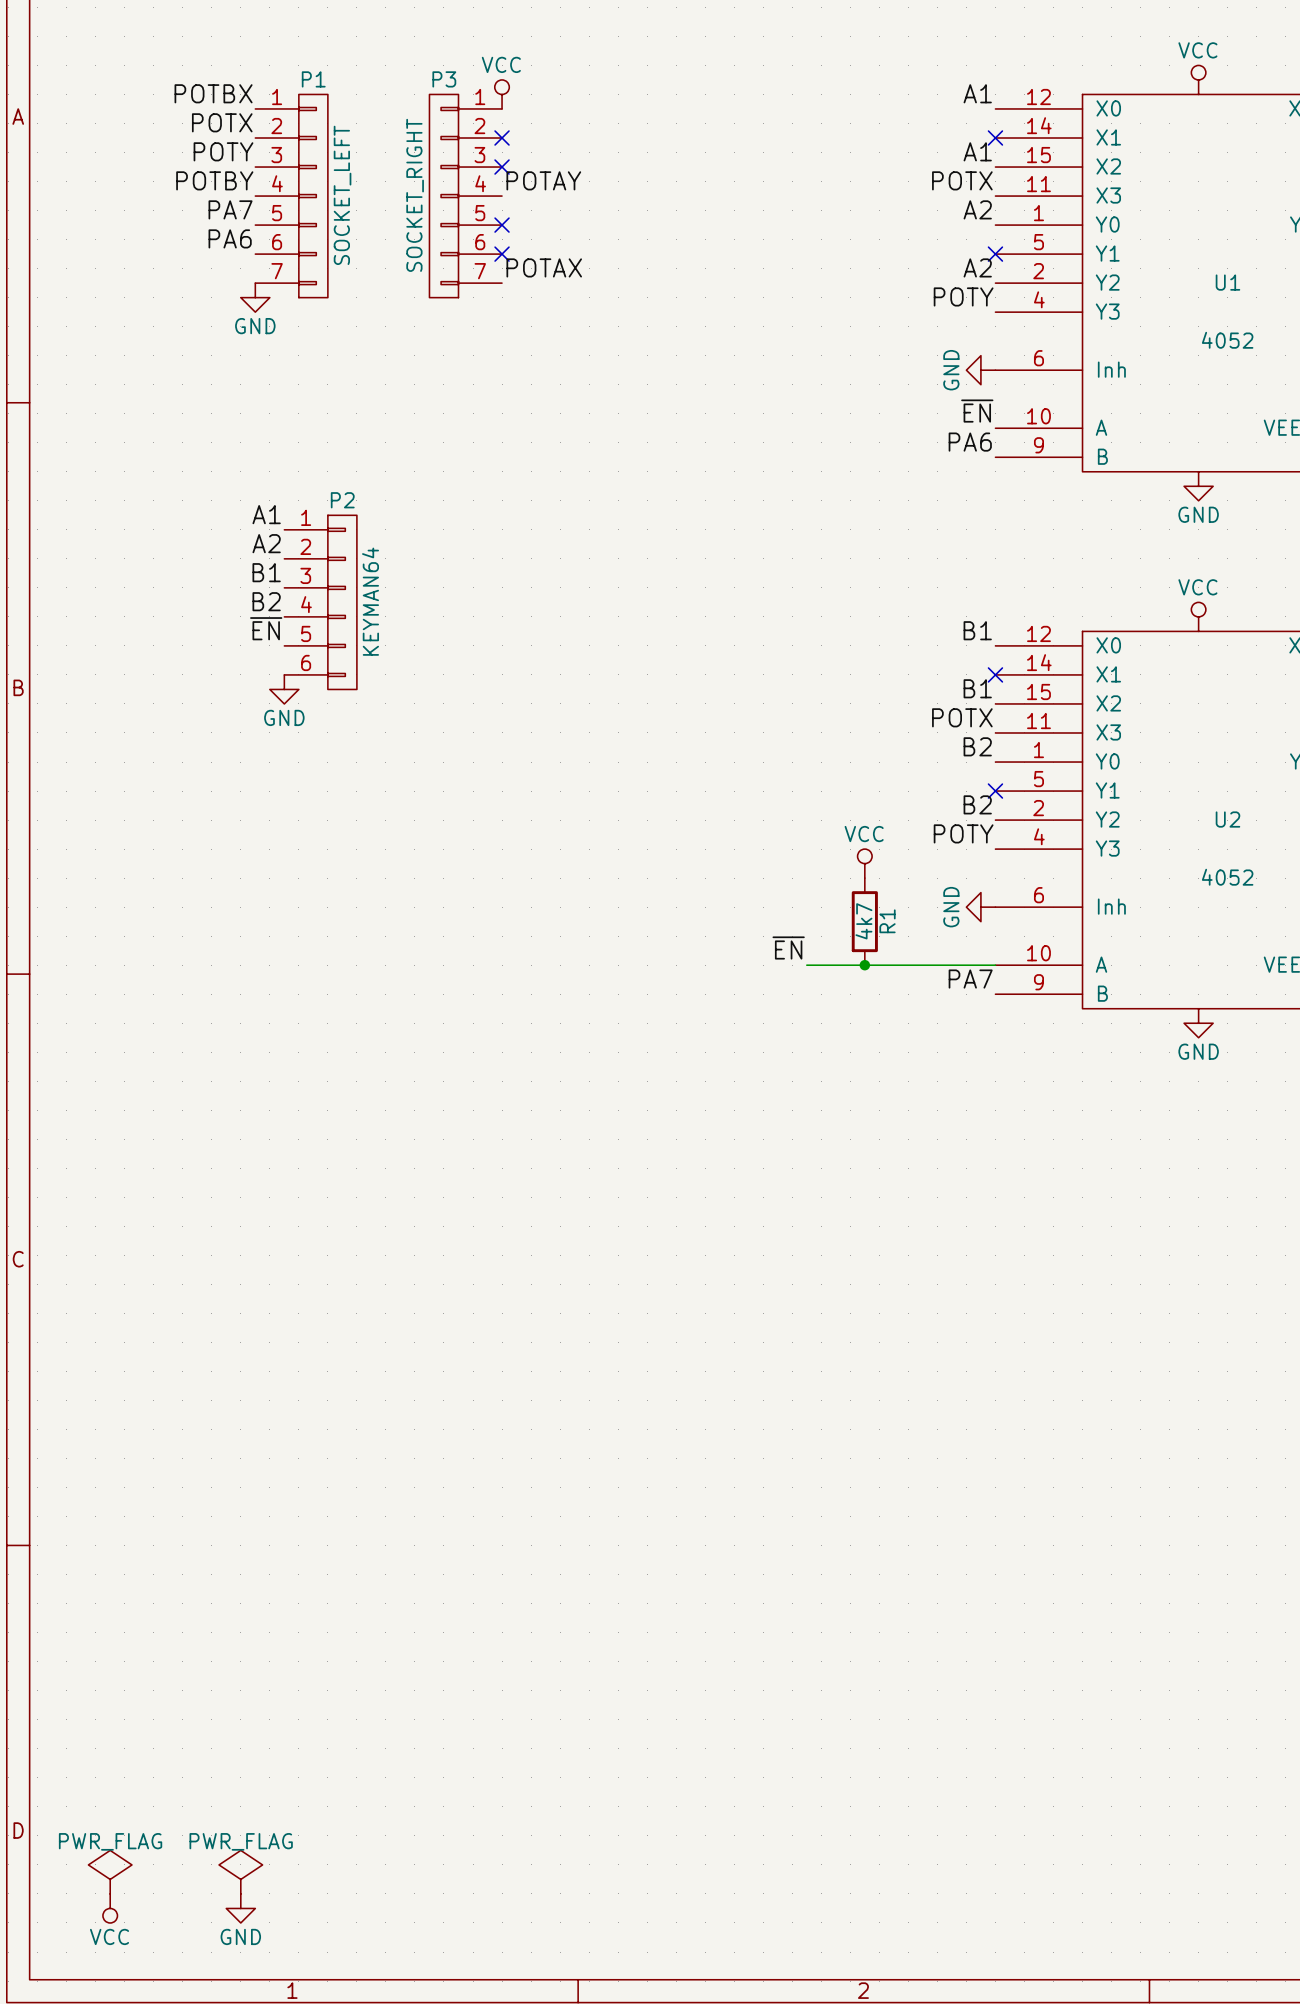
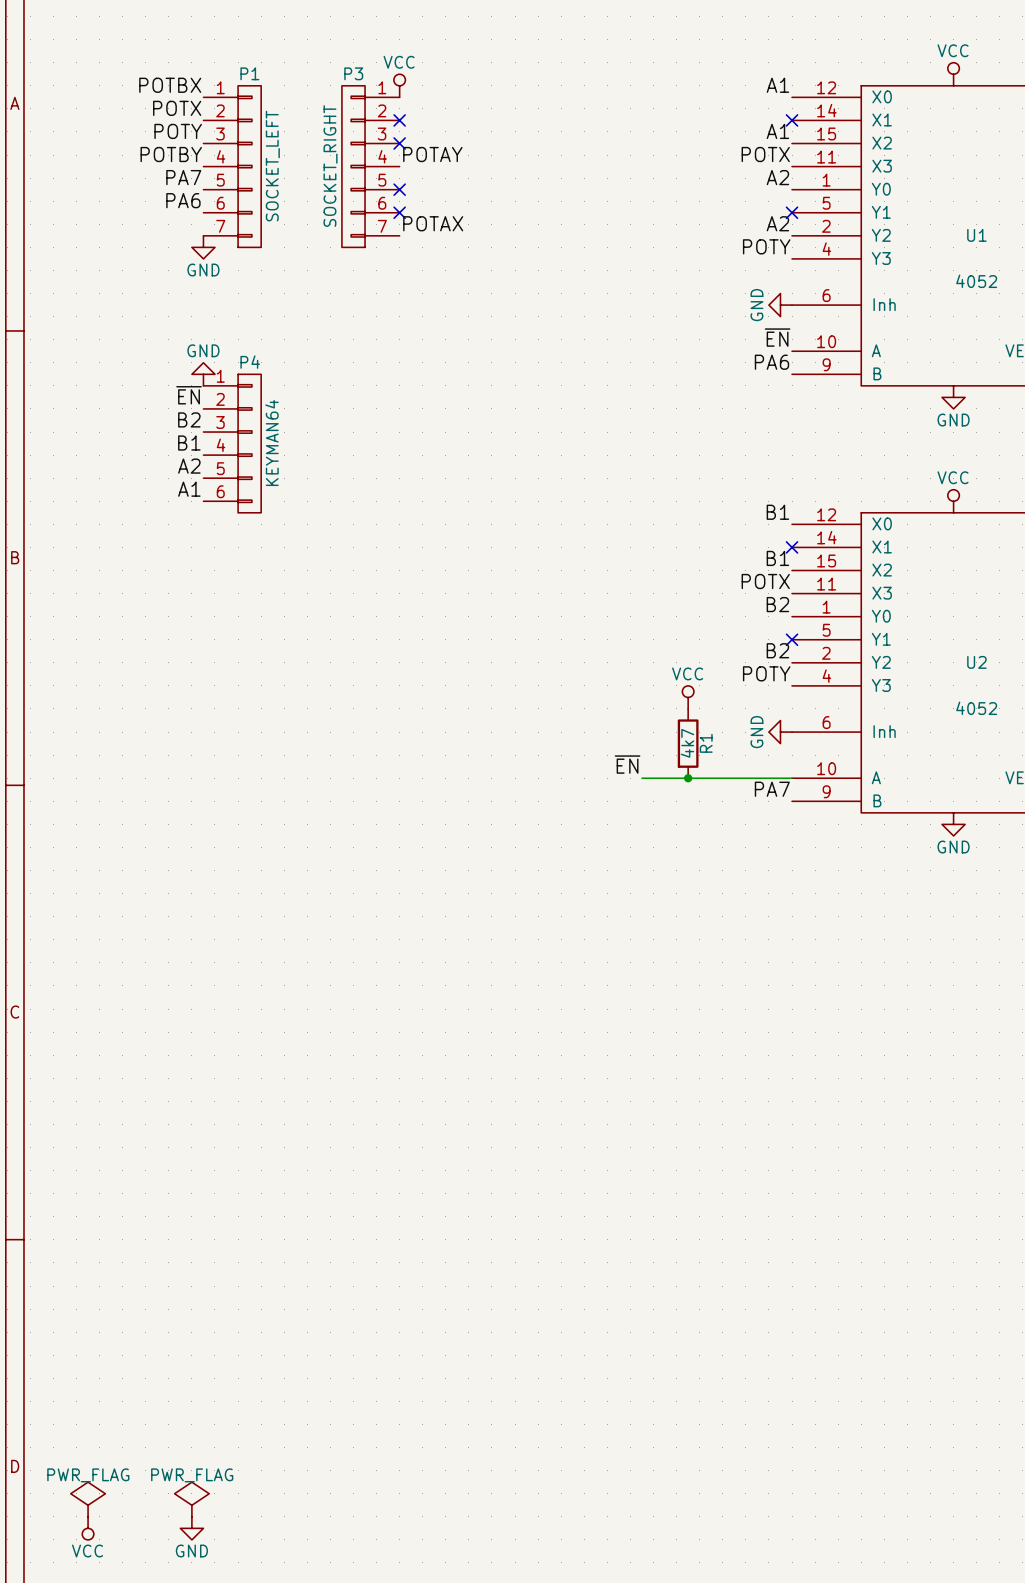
label position: A1 (266, 514) -> A1 (189, 489)
label position: A2 (266, 543) -> A2 (189, 466)
P4: none -> KEYMAN64 (232, 443)
label position: B1 (266, 572) -> B1 (189, 443)
label position: B2 (266, 601) -> B2 (189, 419)
P2: KEYMAN64 (320, 602) -> none
label position: ~{EN} (266, 628) -> ~{EN} (189, 395)
power symbol rotation: 0° (284, 689) -> 180° (203, 374)
power symbol position: GND (284, 689) -> GND (203, 374)

